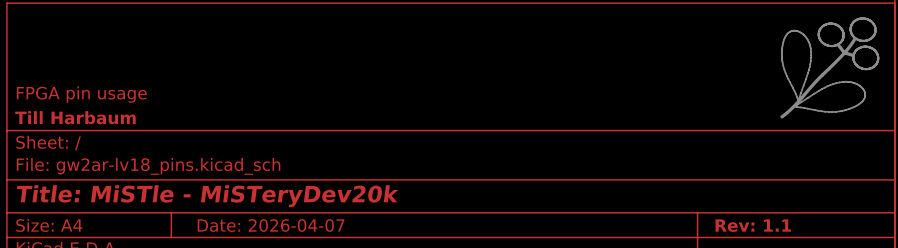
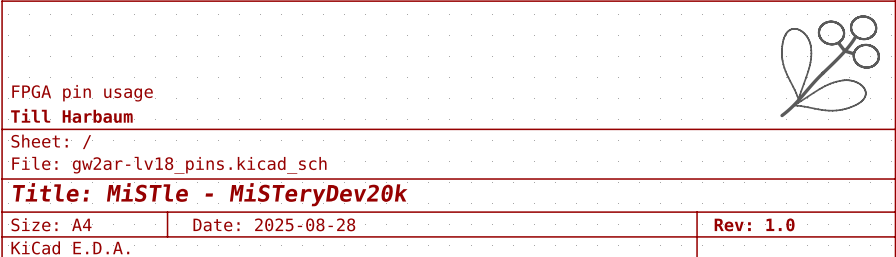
title block: Date: 2026-04-07 (271, 225) -> Date: 2025-08-28 (274, 224)
title block: Rev: 1.1 (753, 225) -> Rev: 1.0 (754, 224)

